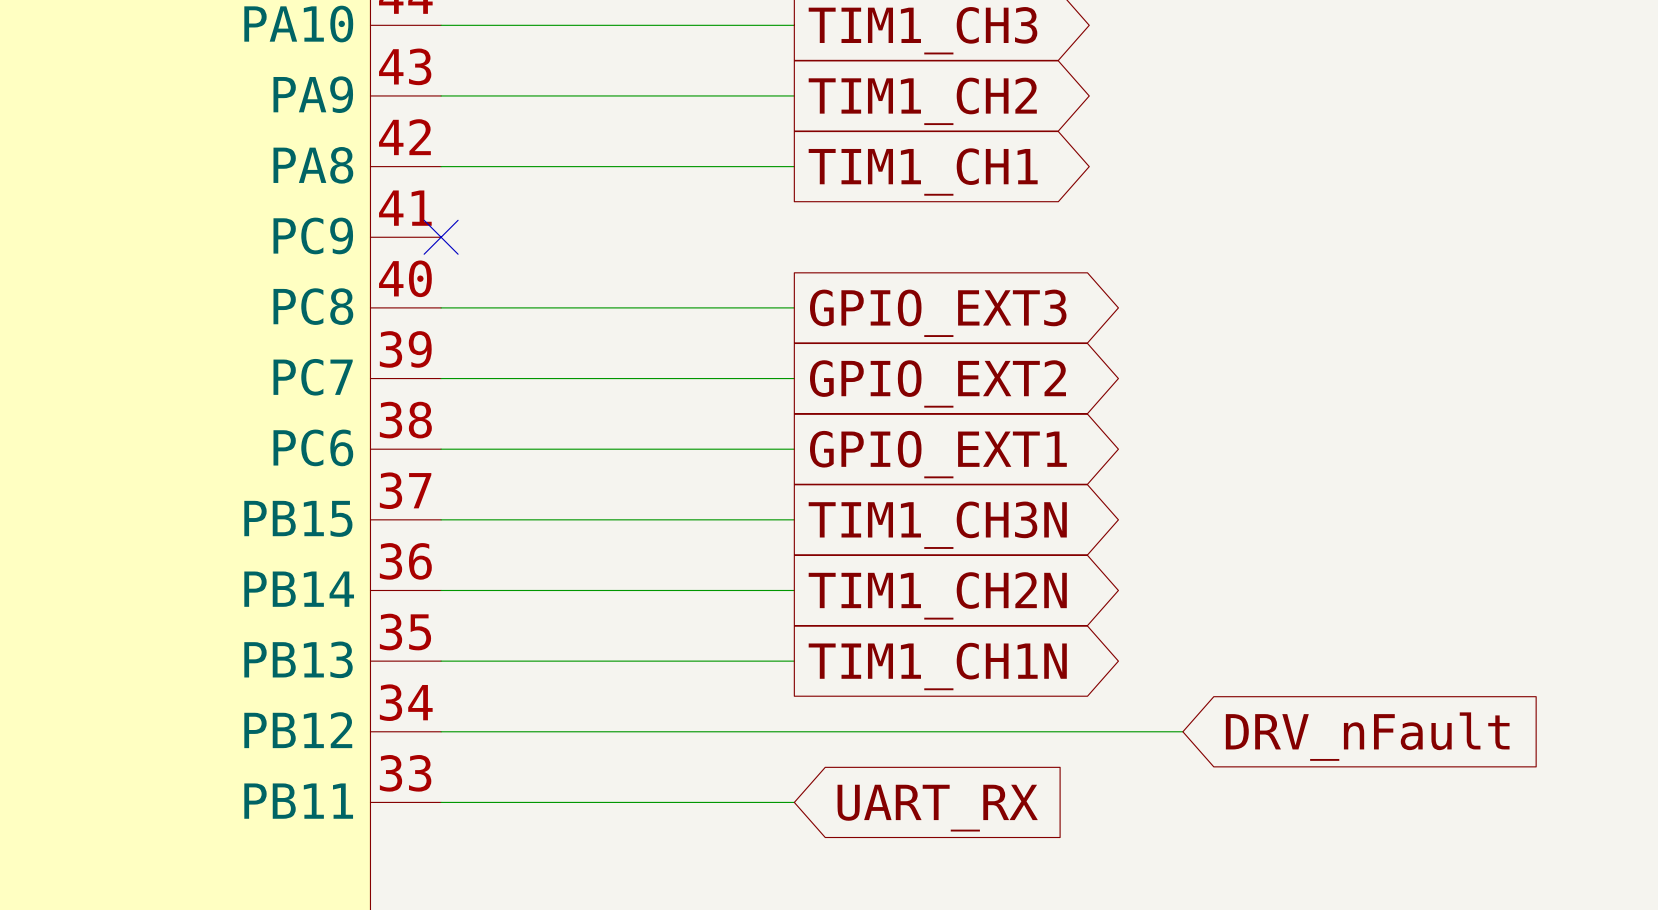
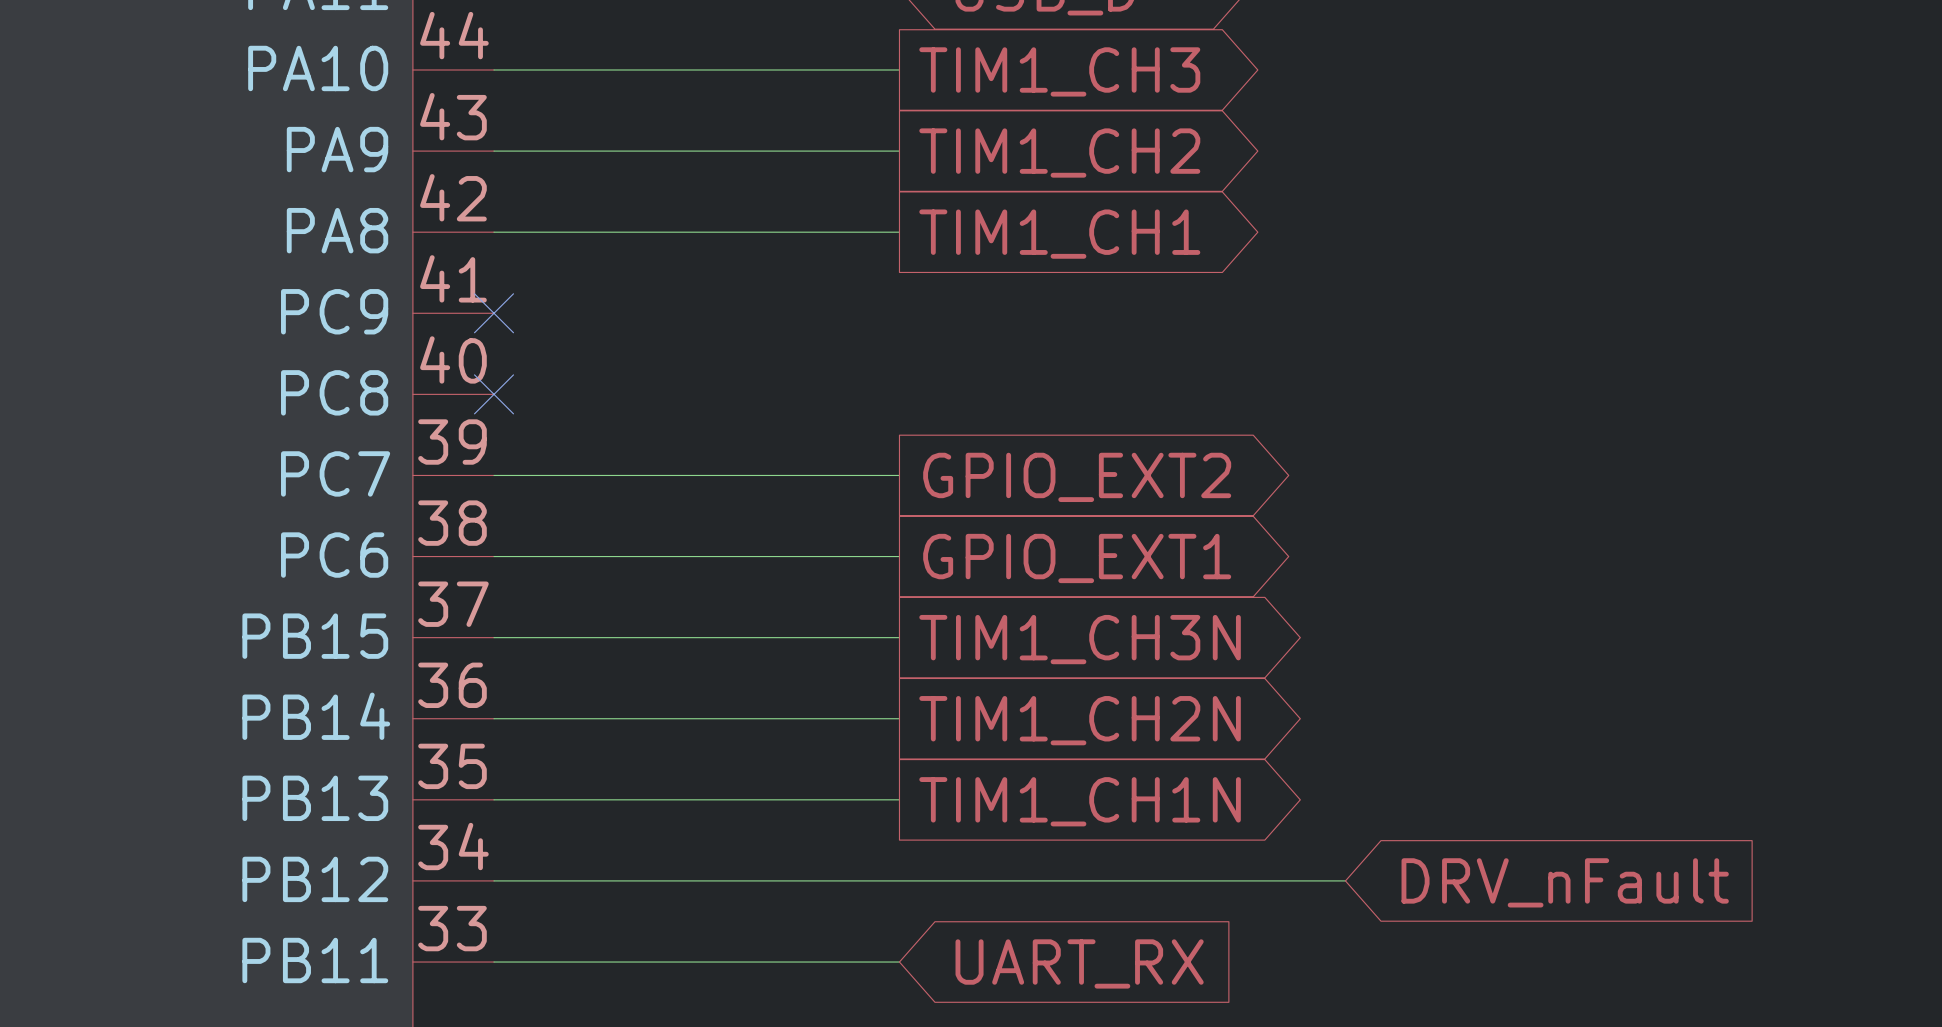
wire: (441, 307) (794, 307) -> none
no-connect mark: none -> (494, 394)
global label: GPIO_EXT3 (938, 313) -> none

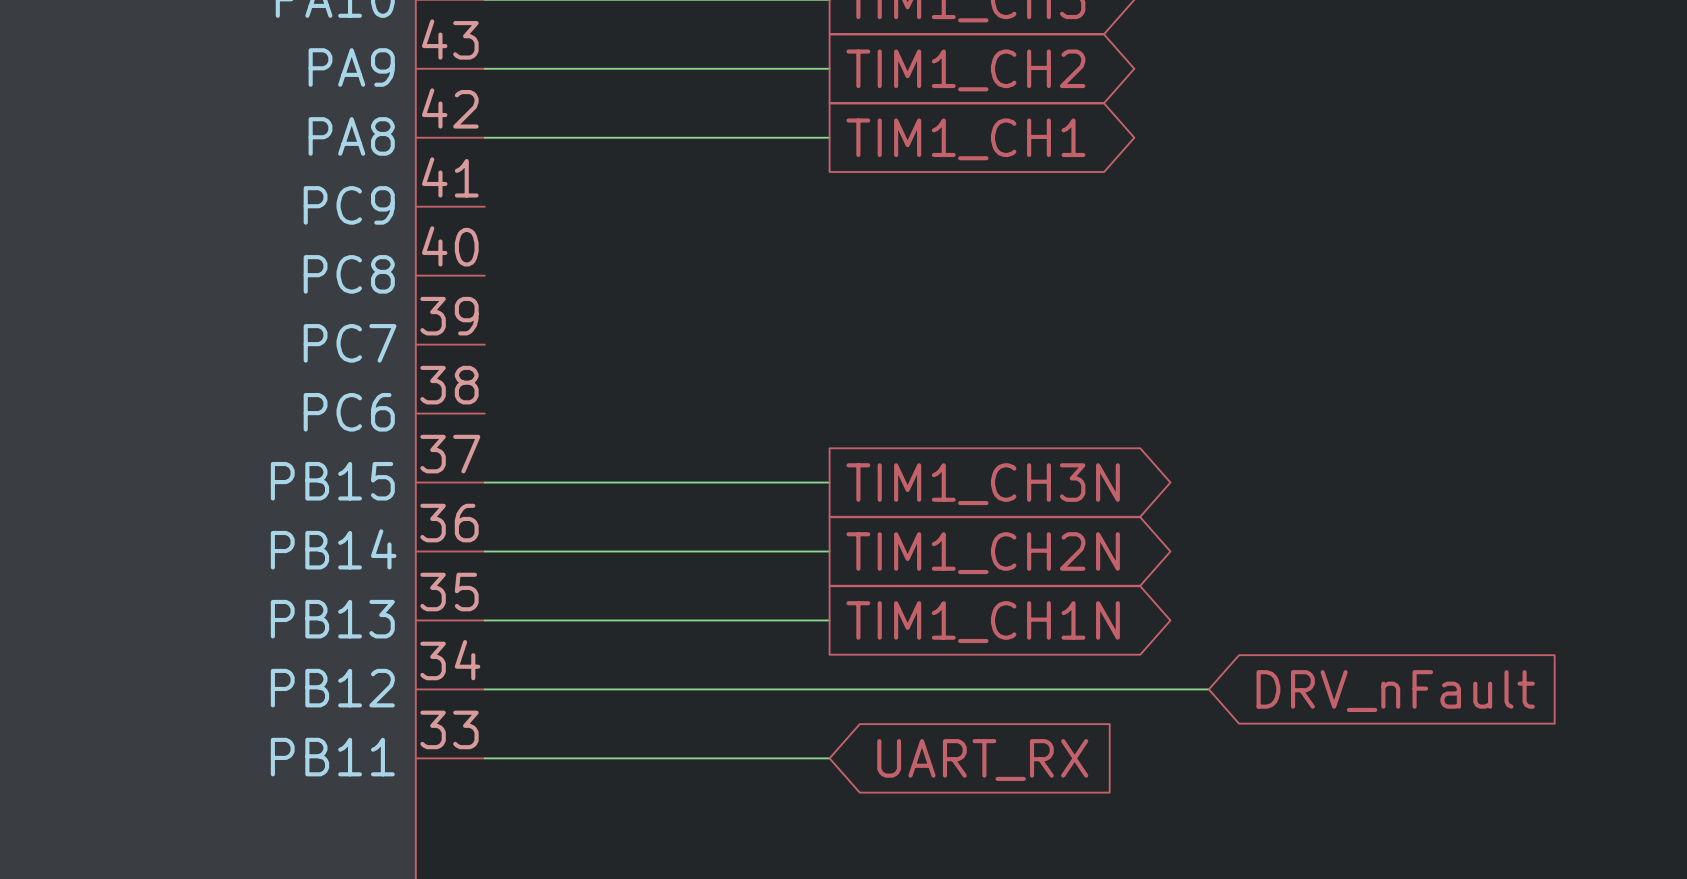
no-connect mark: (494, 313) -> none
no-connect mark: (494, 394) -> none
wire: (494, 475) (899, 475) -> none
global label: GPIO_EXT2 (1077, 477) -> none
wire: (494, 556) (899, 556) -> none
global label: GPIO_EXT1 (1077, 558) -> none

